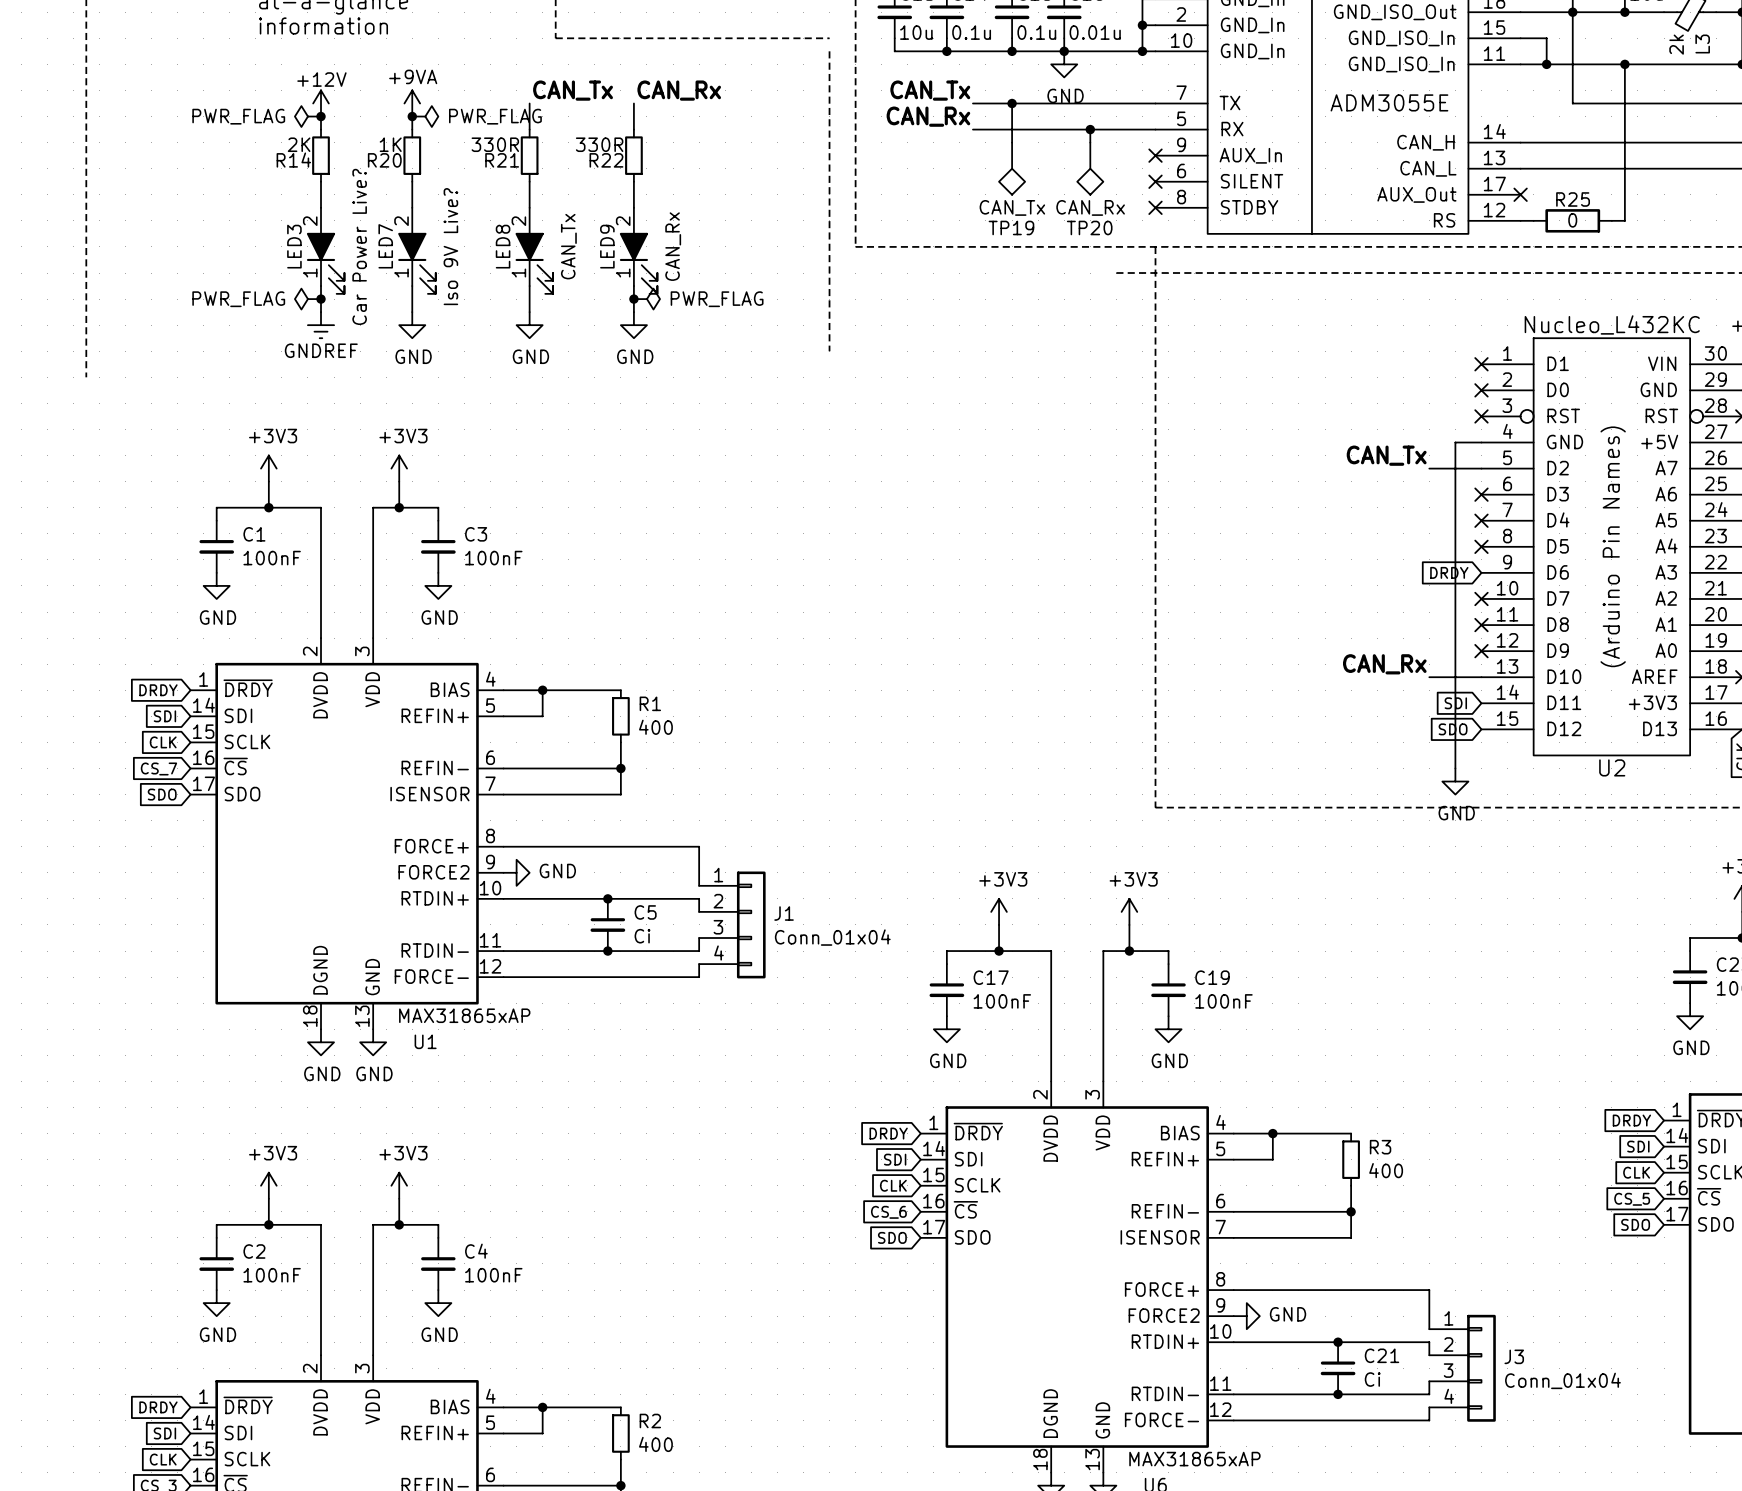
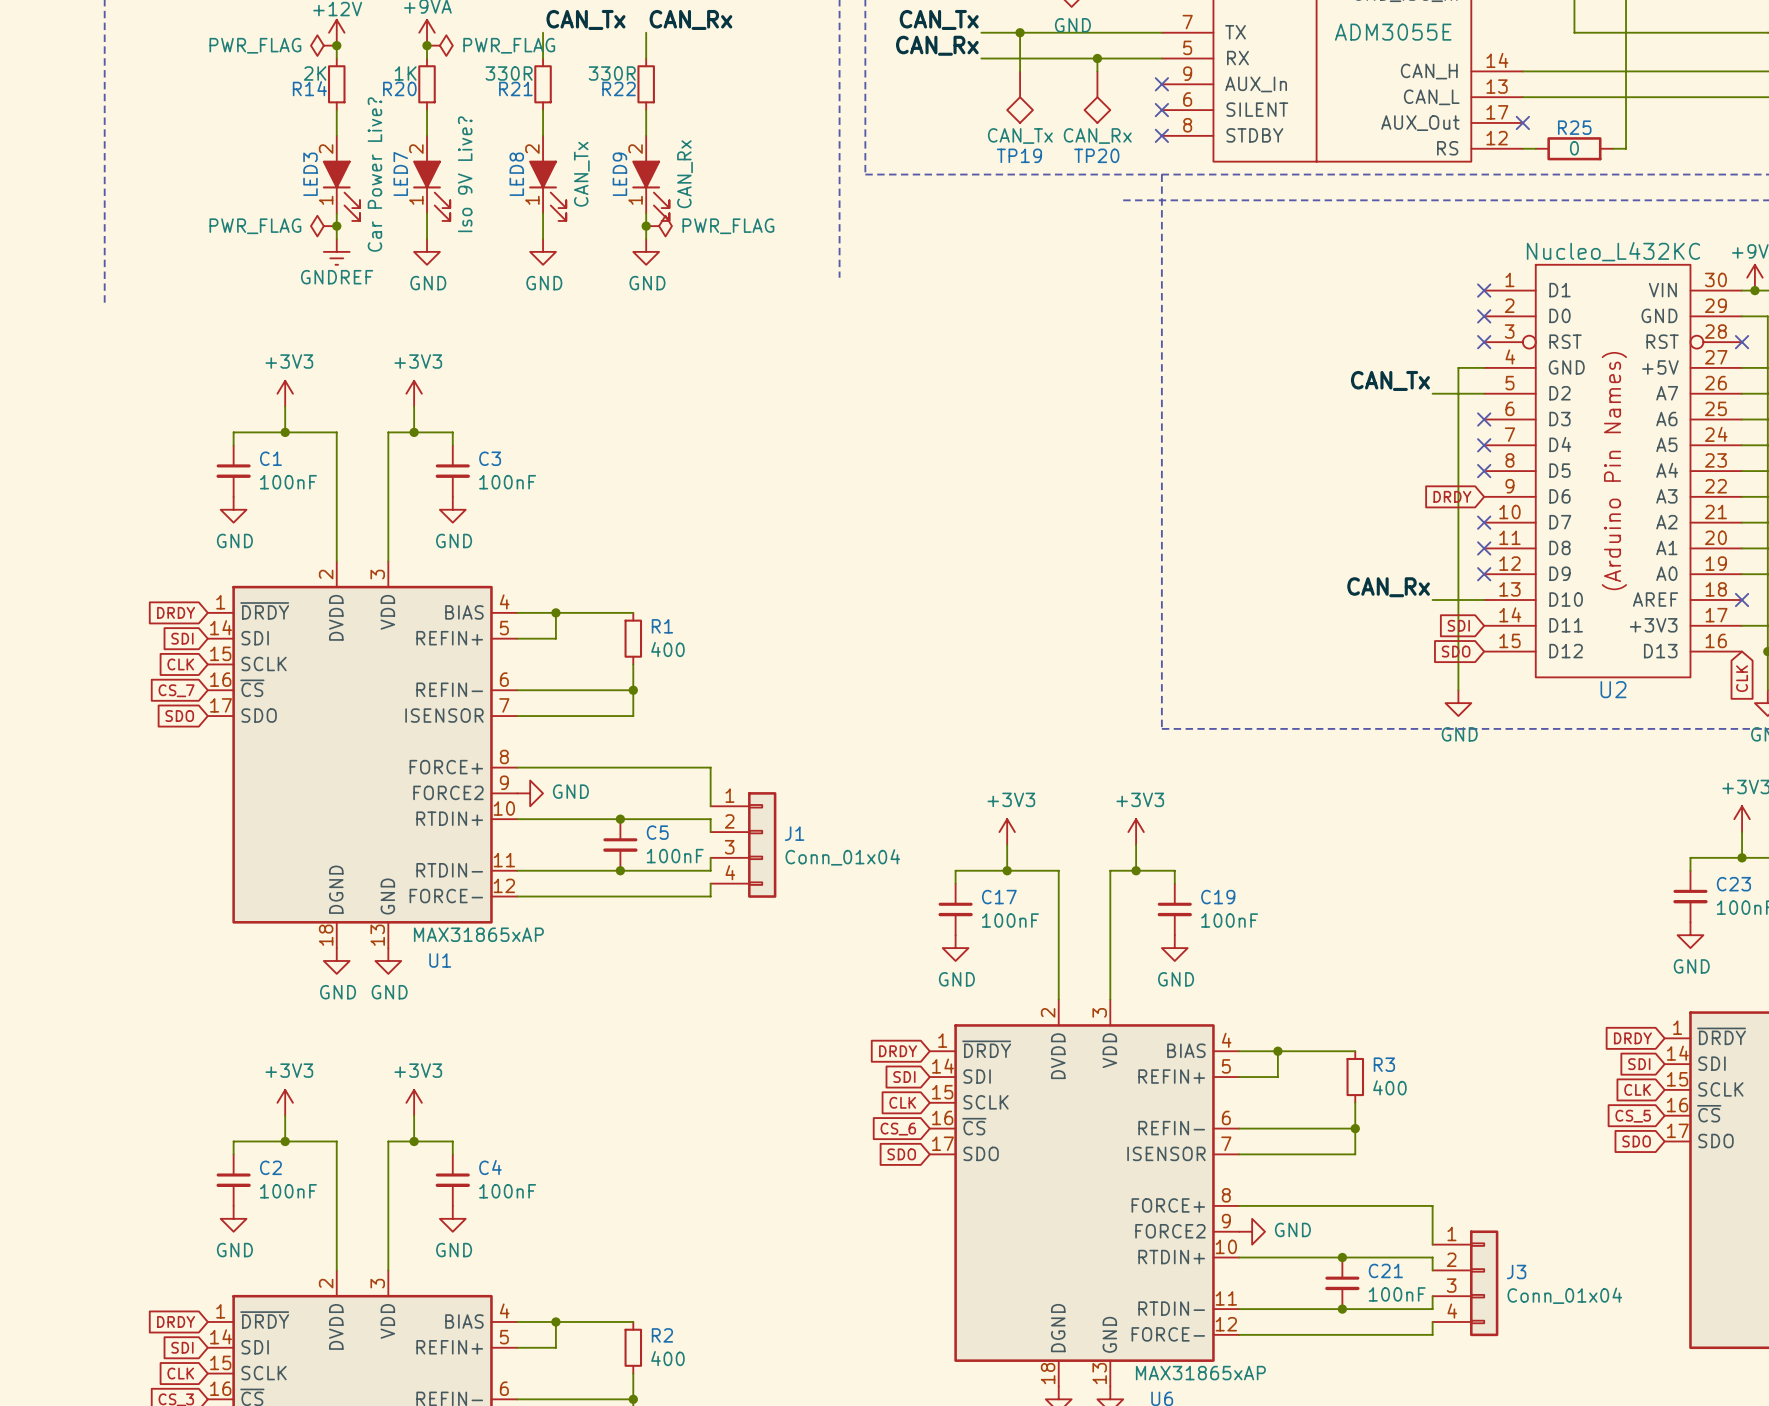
C5 value: Ci (642, 936) -> 100nF (675, 856)
C21 value: Ci (1372, 1379) -> 100nF (1397, 1294)

